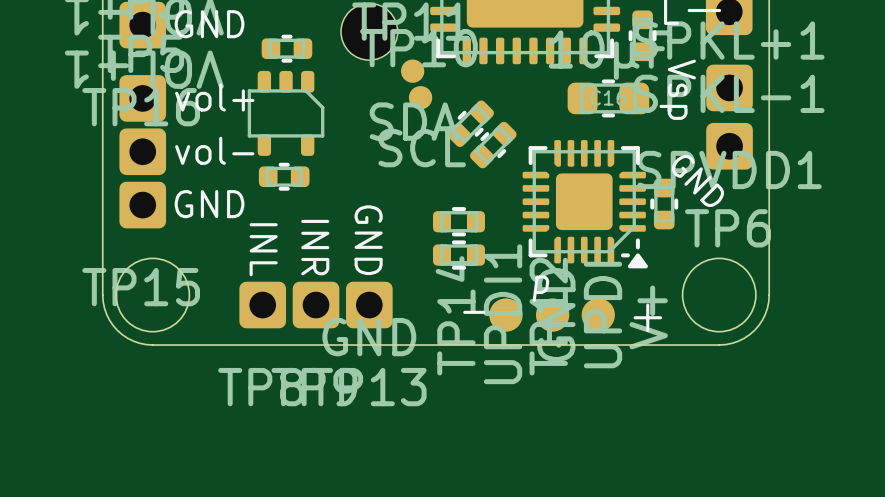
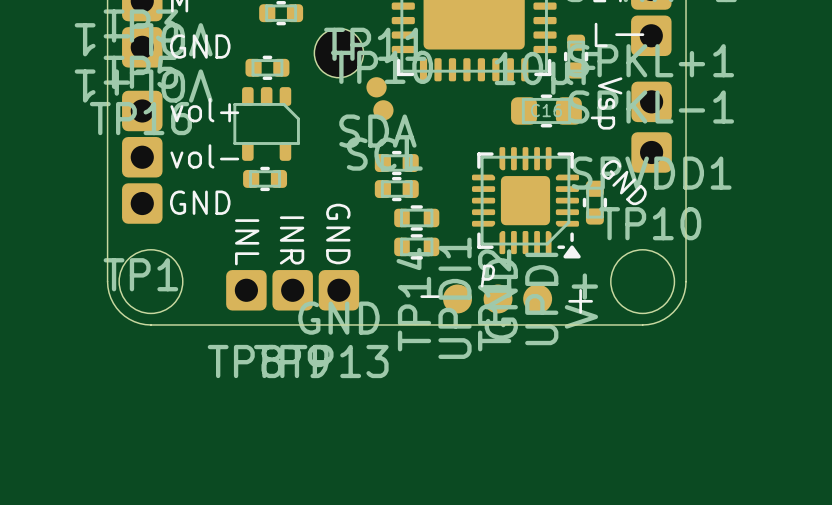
part: (470, 123) -> none
part: (493, 145) -> none
part: none -> (396, 163)
part: none -> (396, 189)
TP6 name: TP6 (727, 228) -> TP10 (650, 223)
TP15 name: TP15 (141, 287) -> TP1 (140, 274)

